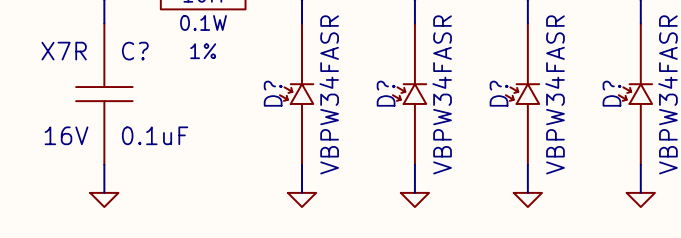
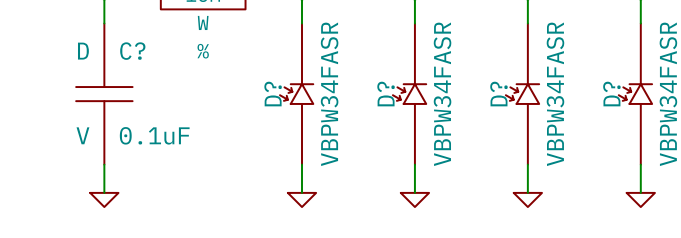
part text: 0.1W (203, 22) -> W (203, 22)
C? text: X7R (64, 51) -> D (83, 51)
part text: 1% (203, 51) -> % (203, 51)
C? text: 16V (66, 135) -> V (82, 135)

